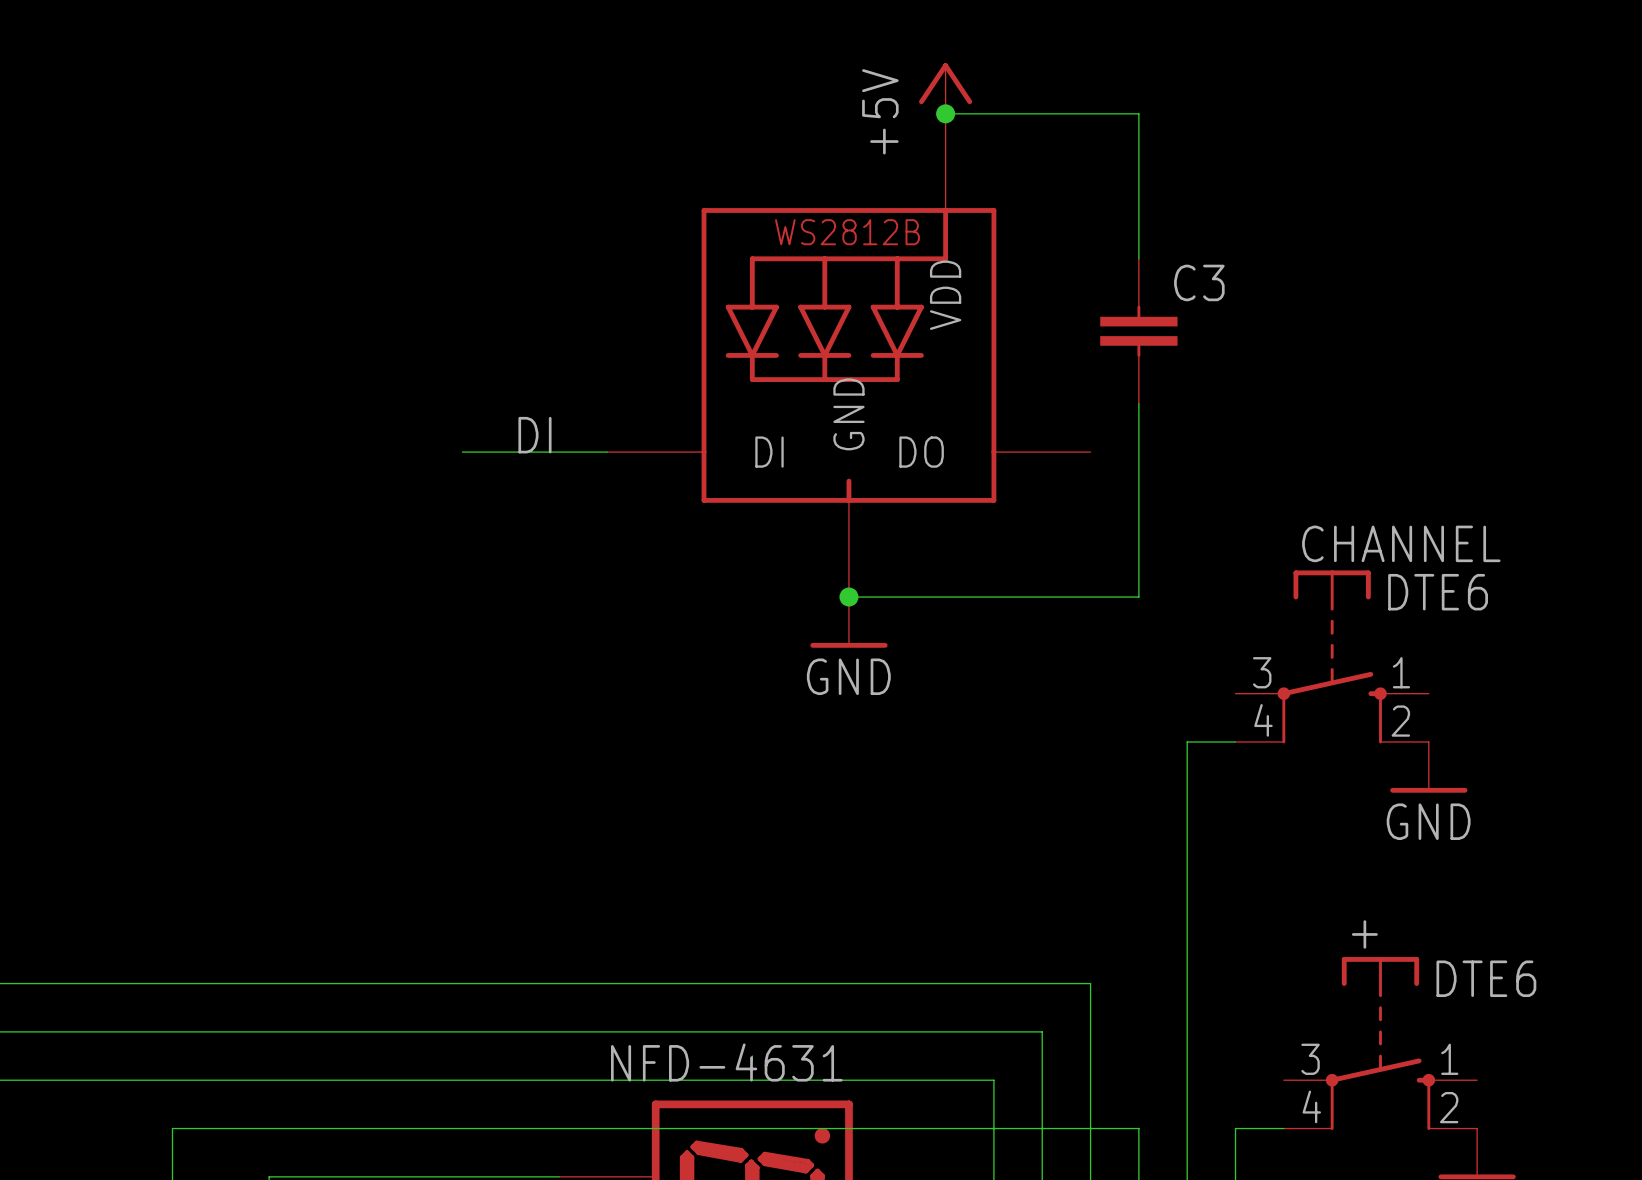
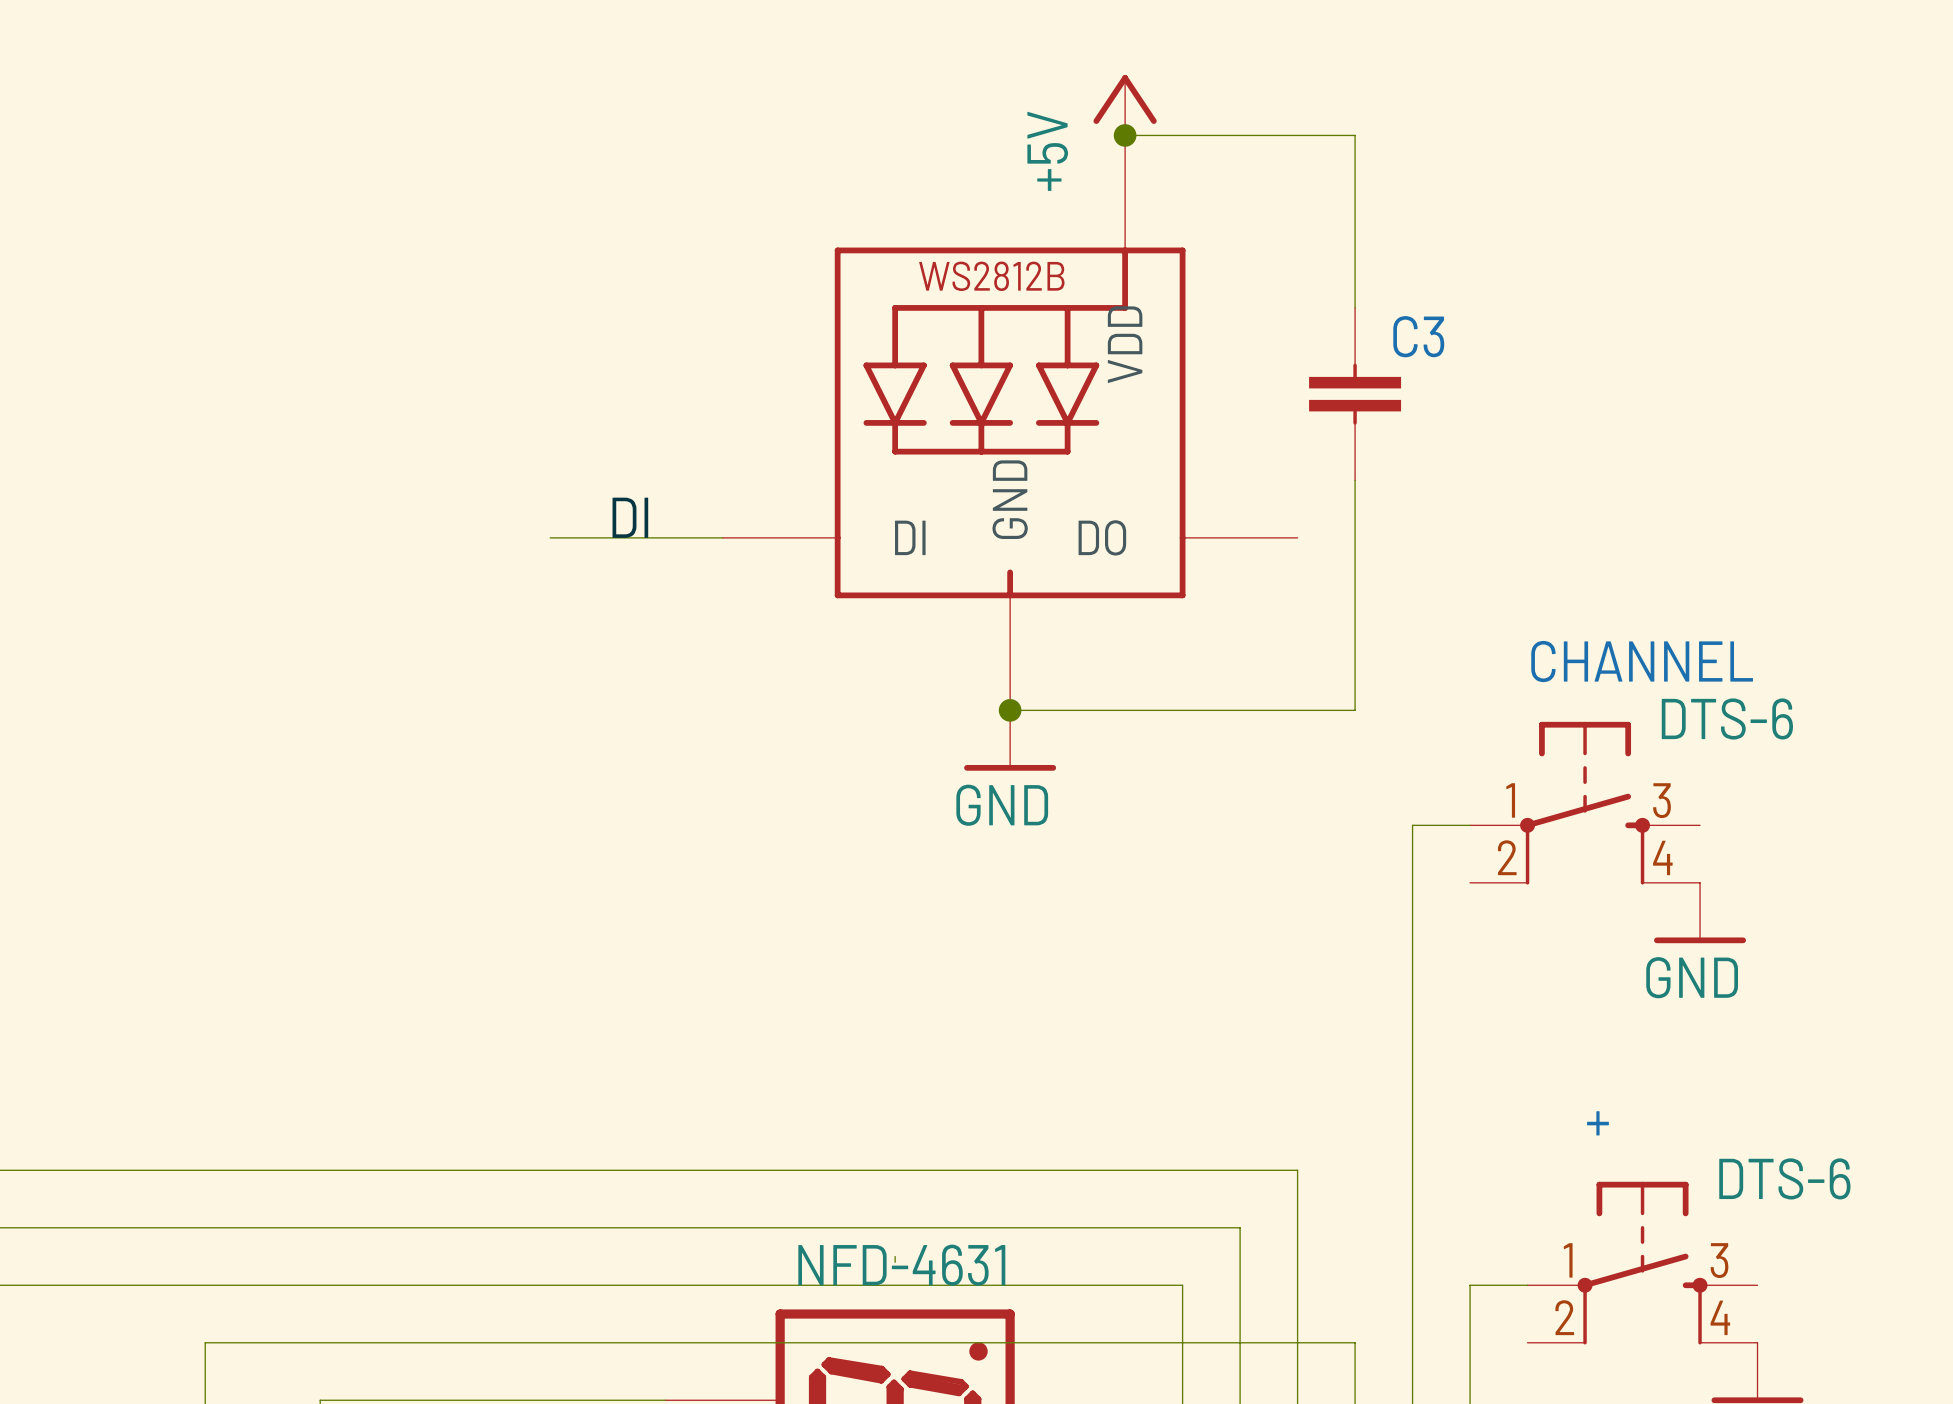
CHANNEL symbol: [1235, 570, 1429, 744] -> [1470, 721, 1701, 885]
CHANNEL value: DTE6 (1438, 592) -> DTS-6 (1727, 718)
wire: (1187, 741) (1235, 741) -> (1412, 882) (1412, 825) (1470, 825)
part symbol: [1283, 957, 1478, 1130] -> [1527, 1181, 1758, 1345]
part value: DTE6 (1486, 978) -> DTS-6 (1784, 1178)
wire: (1235, 1128) (1283, 1128) -> (1470, 1342) (1470, 1285) (1527, 1285)

